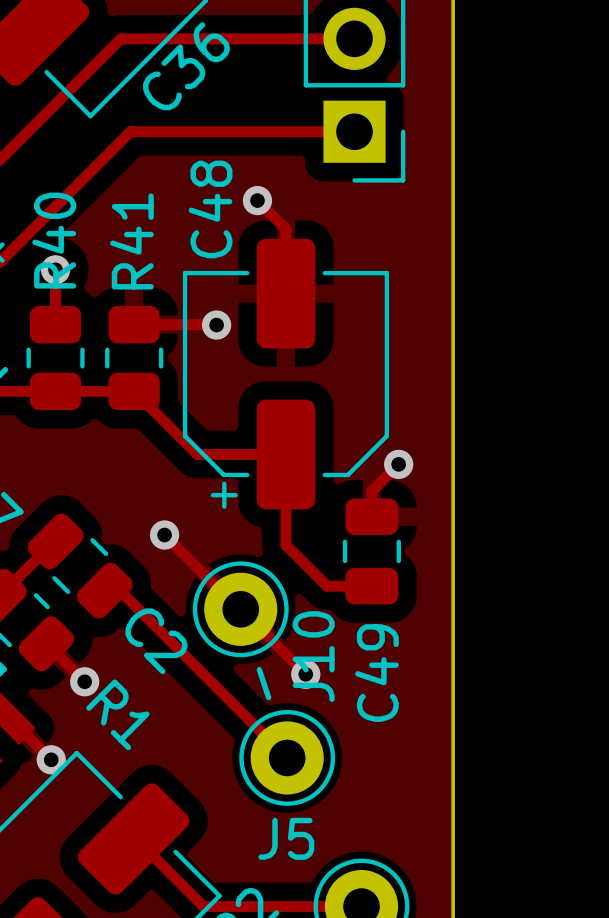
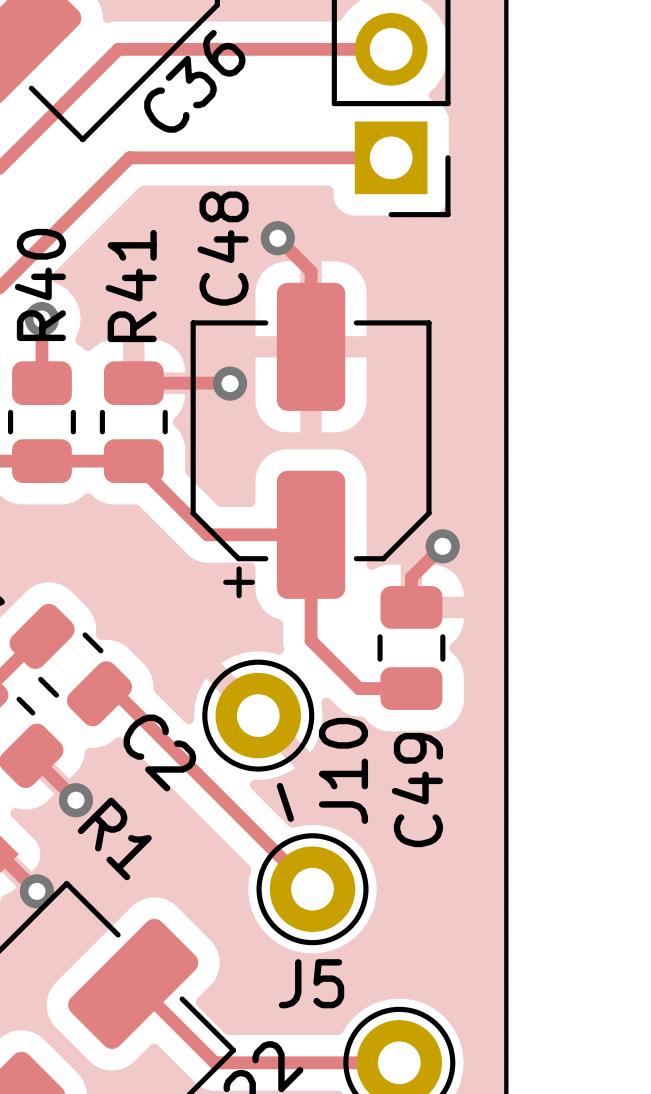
track: (164, 534) (305, 674) -> none
via: (164, 534) -> none
via: (305, 674) -> none

